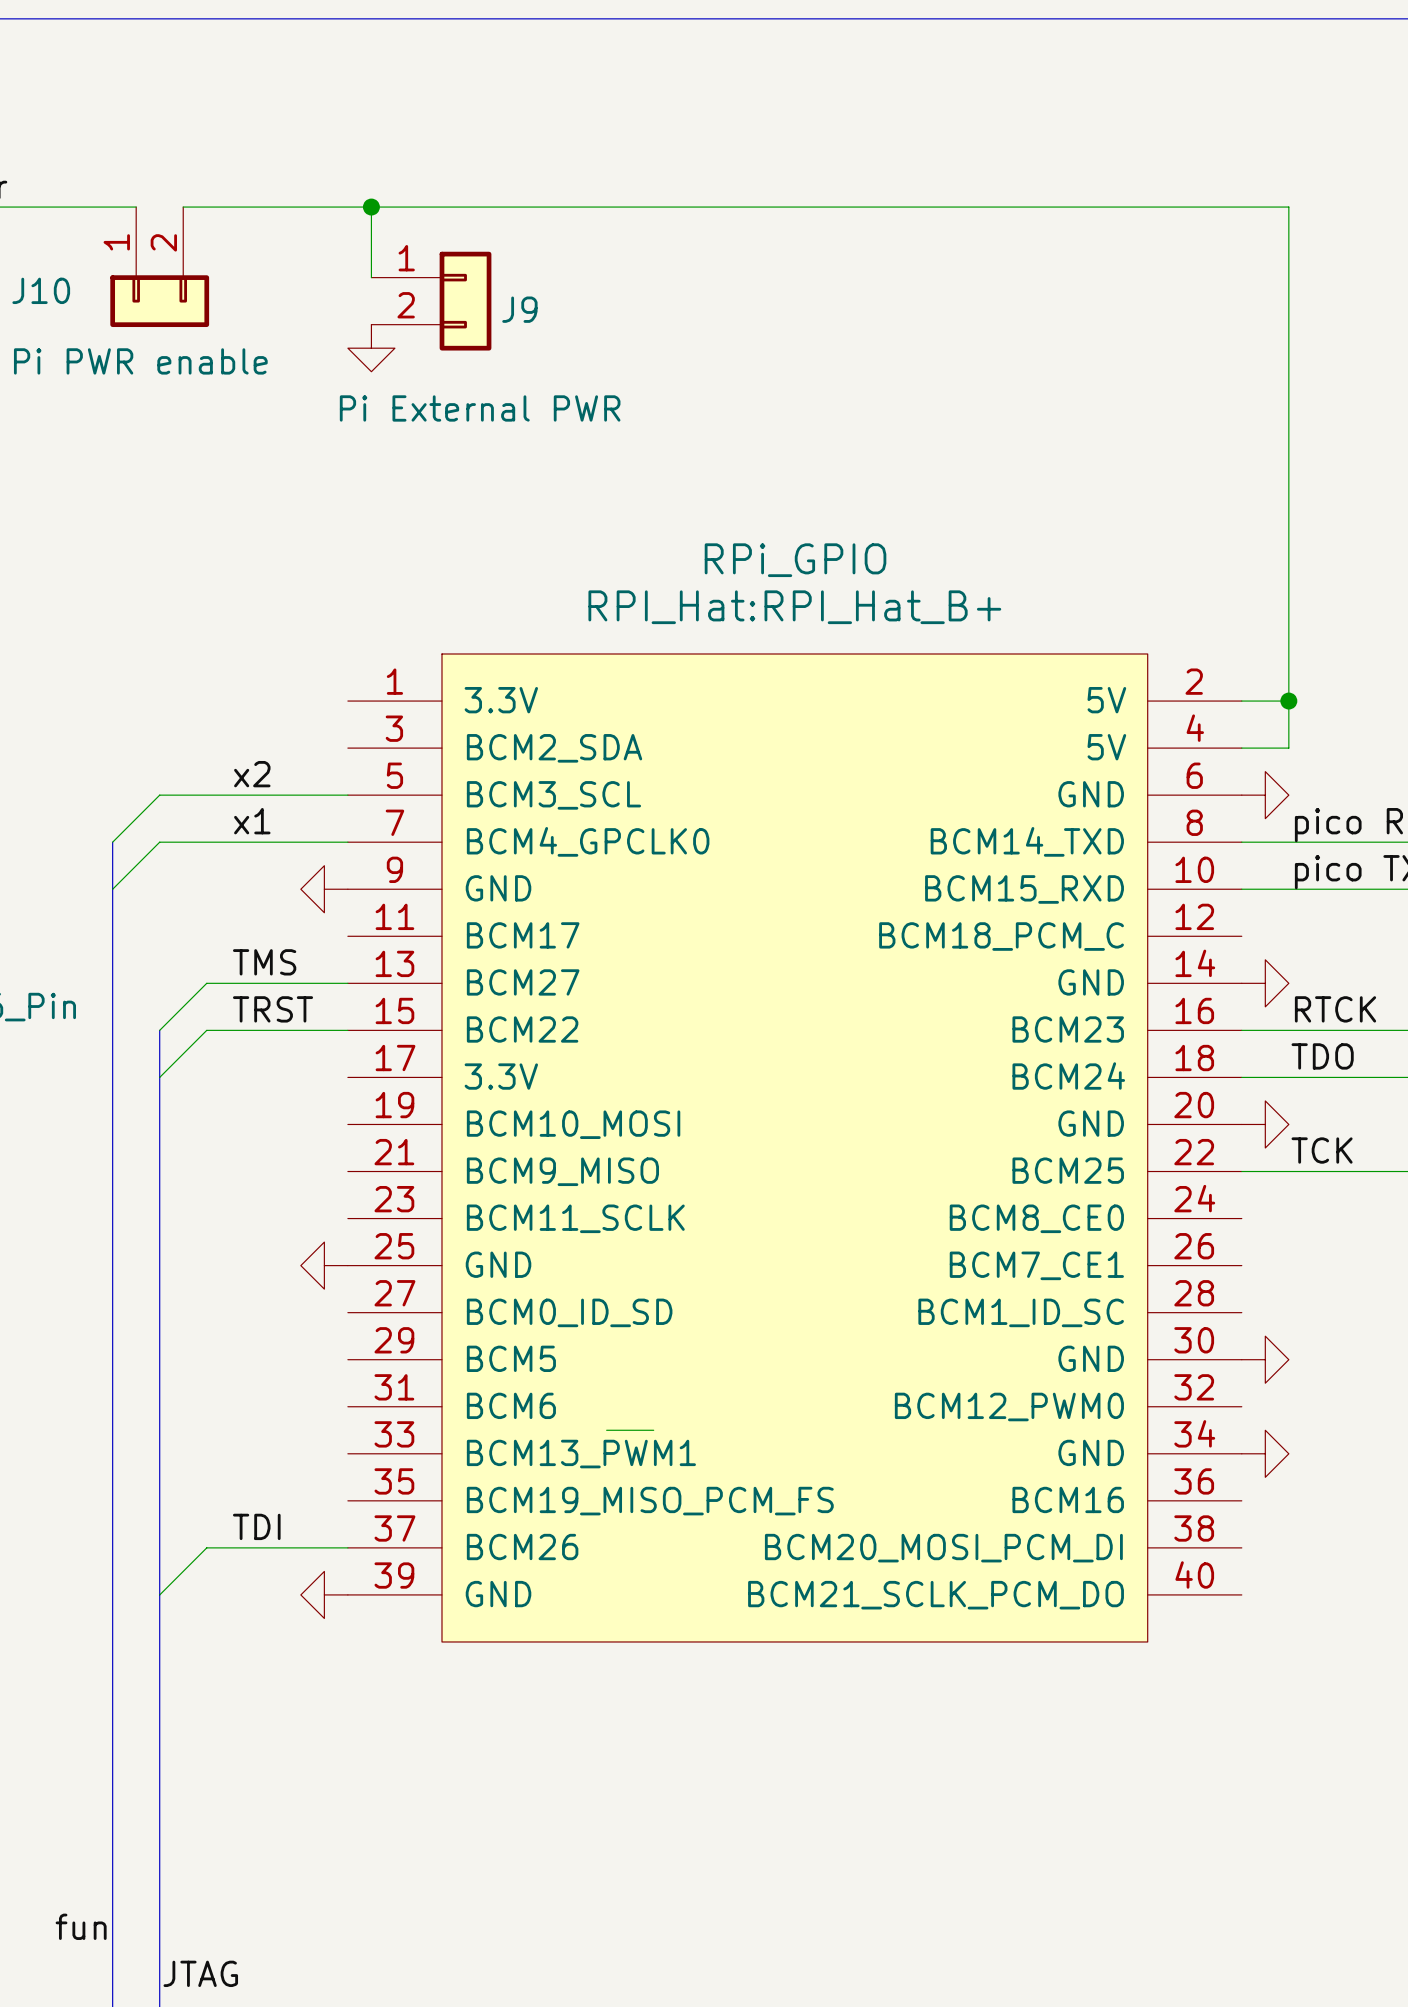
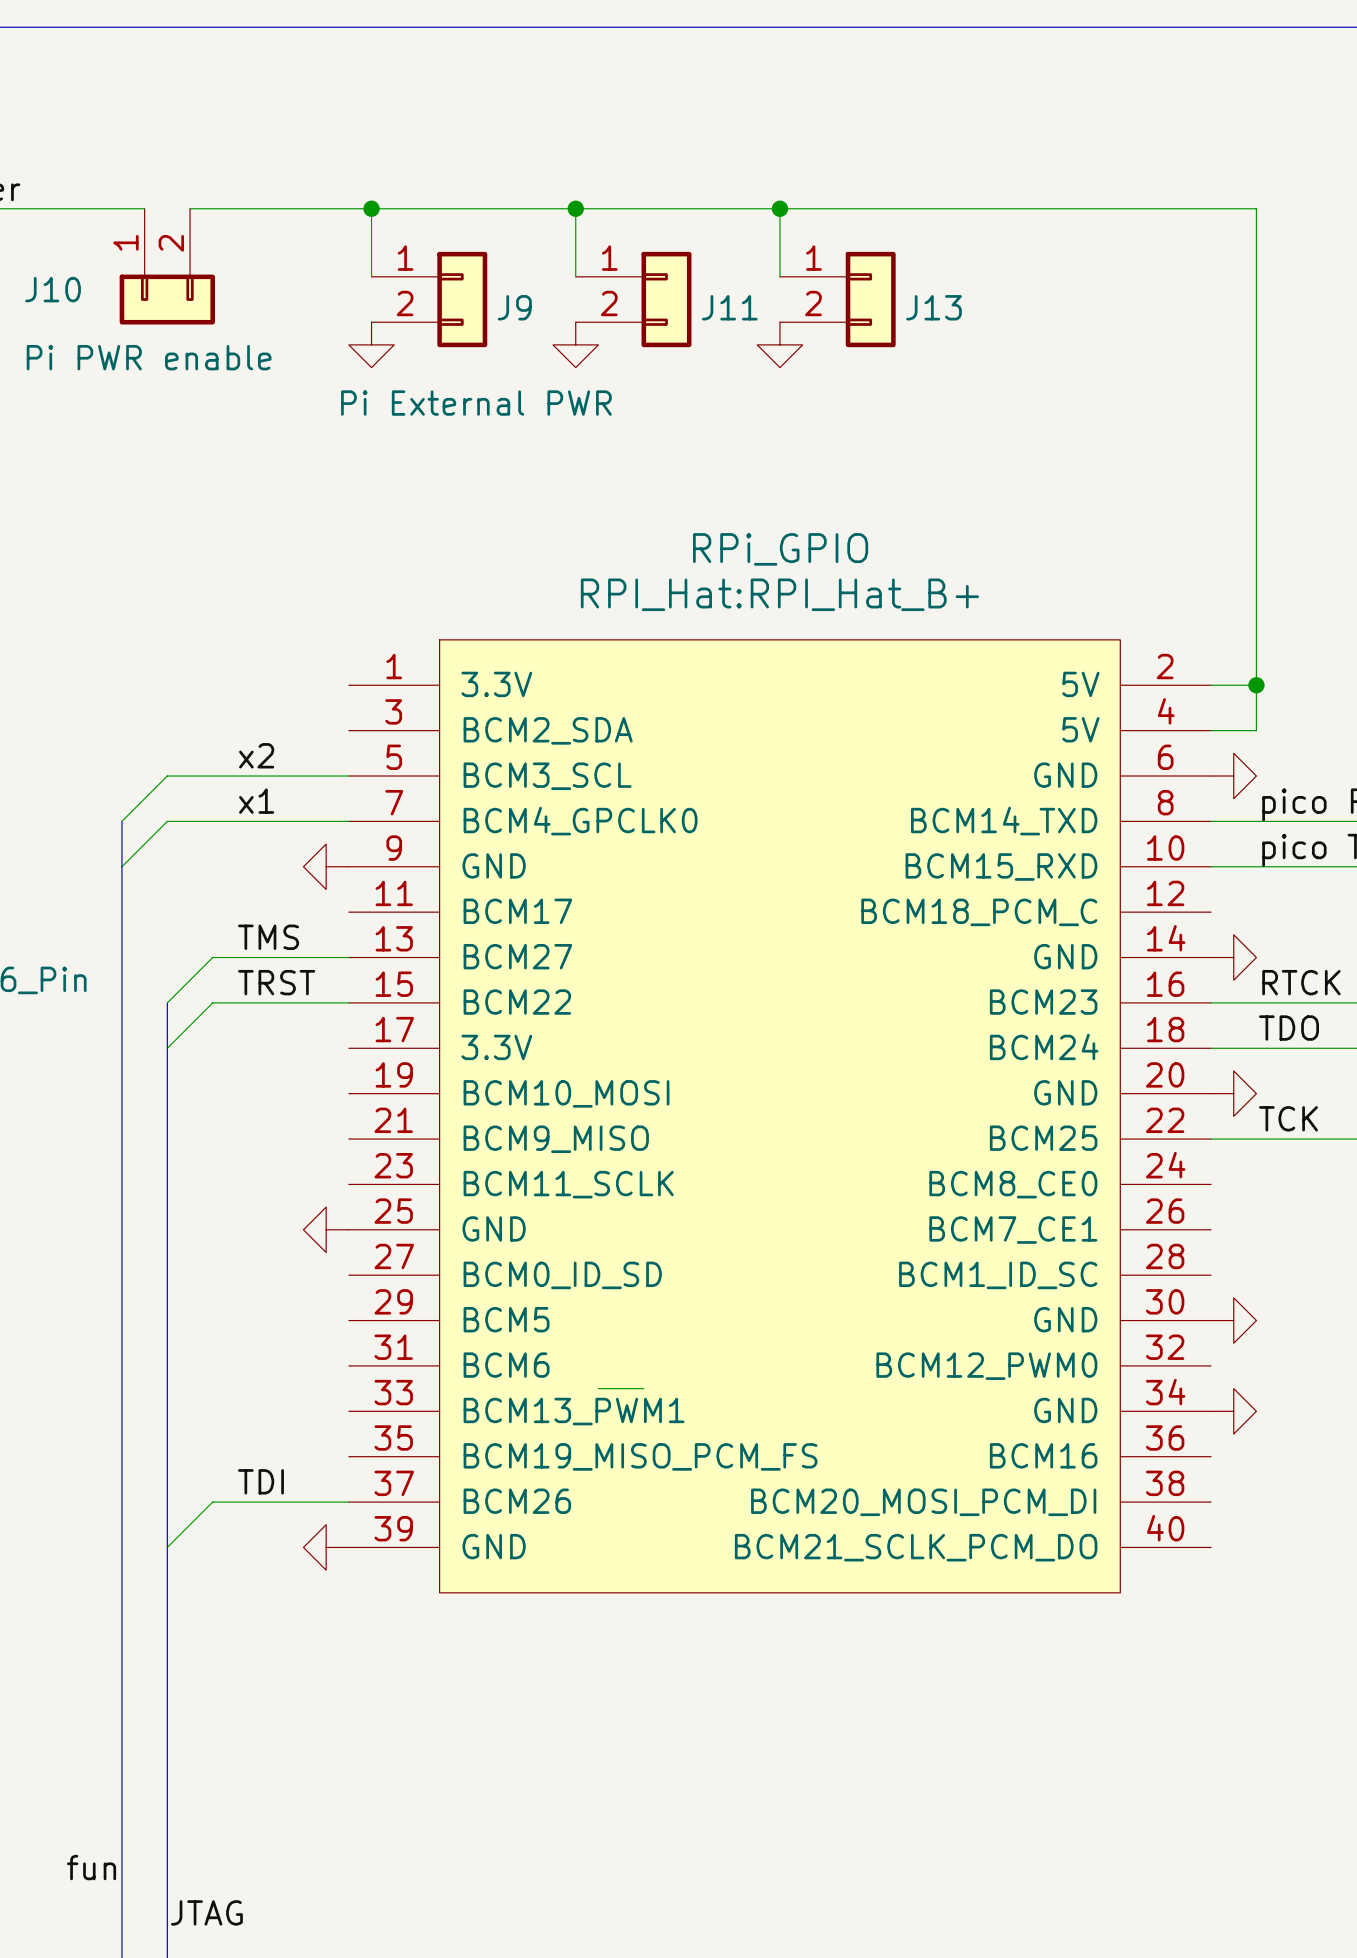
wire: none -> (575, 208) (575, 276)
junction: none -> (575, 208)
wire: none -> (779, 208) (779, 276)
junction: none -> (779, 208)
J11: none -> (633, 299)
J13: none -> (837, 299)
power symbol: none -> (575, 344)
power symbol: none -> (779, 344)

